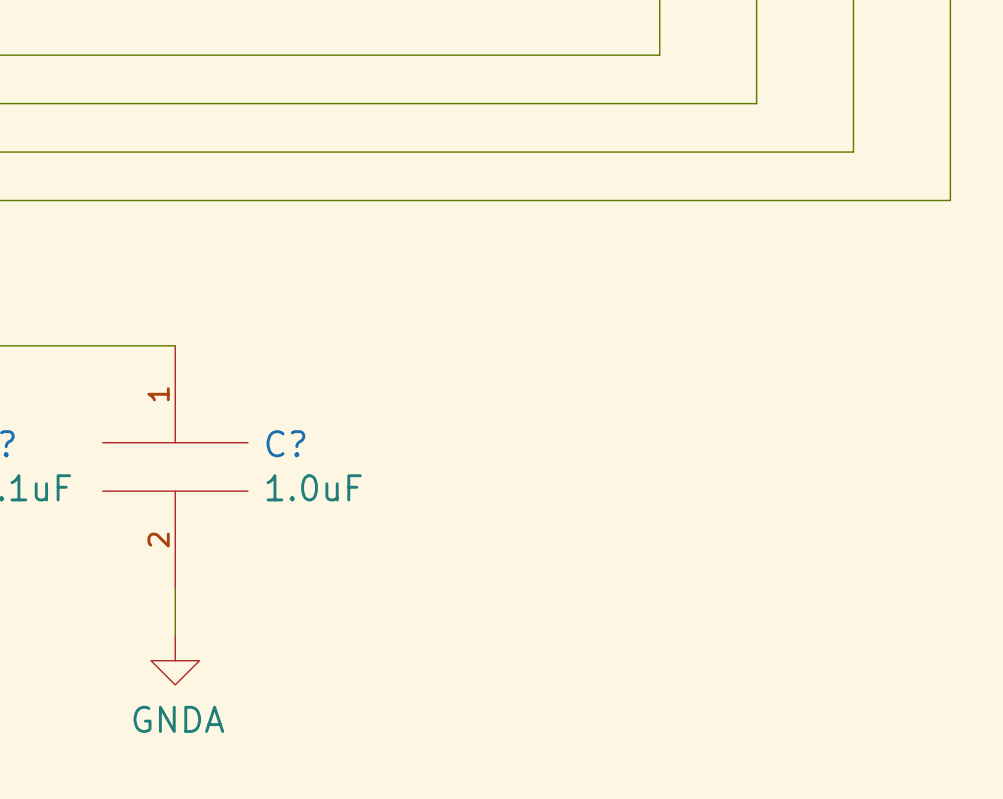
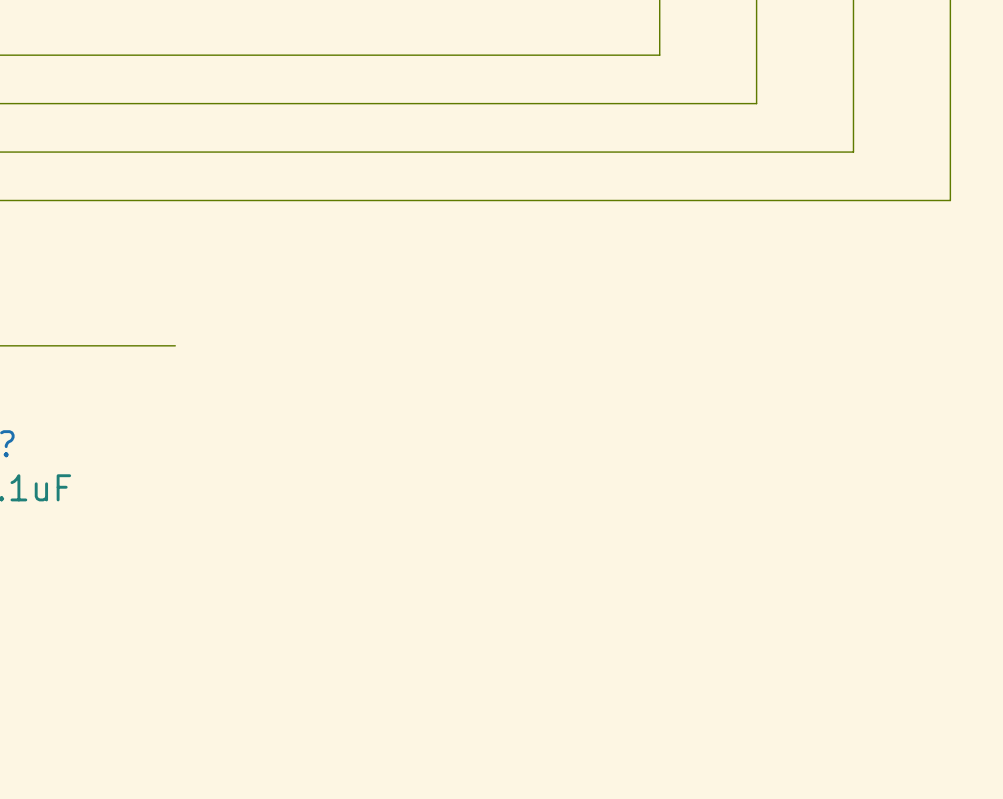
C?: 1.0uF (175, 466) -> none
wire: (175, 588) (175, 636) -> none
power symbol: GNDA (175, 660) -> none

